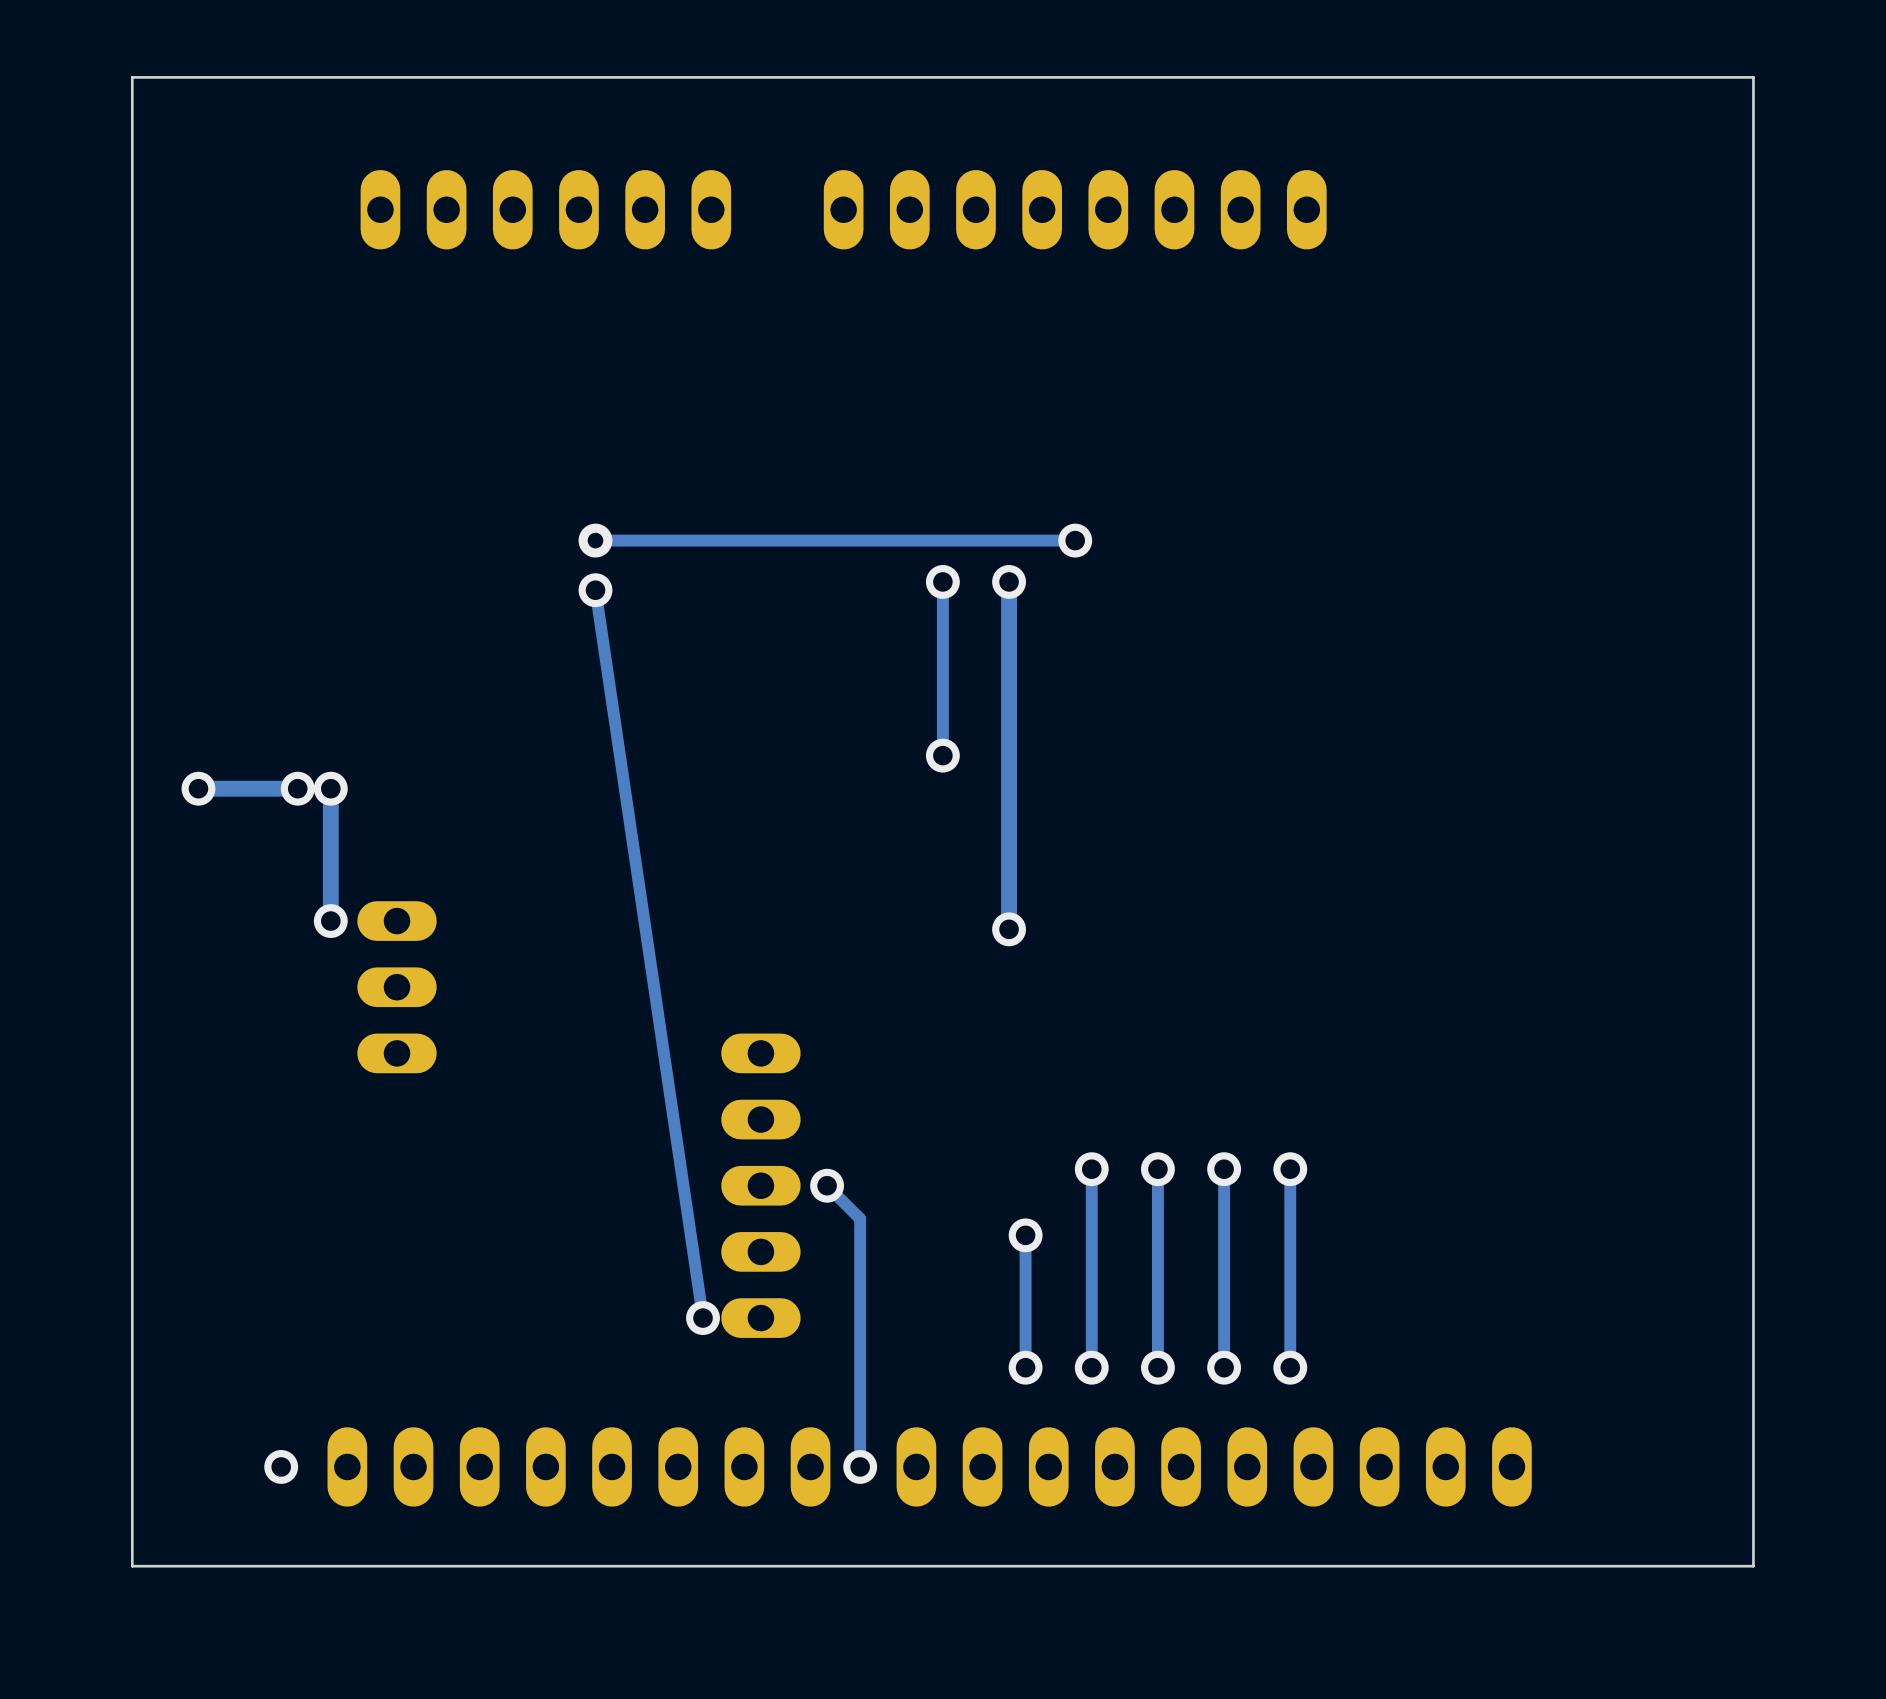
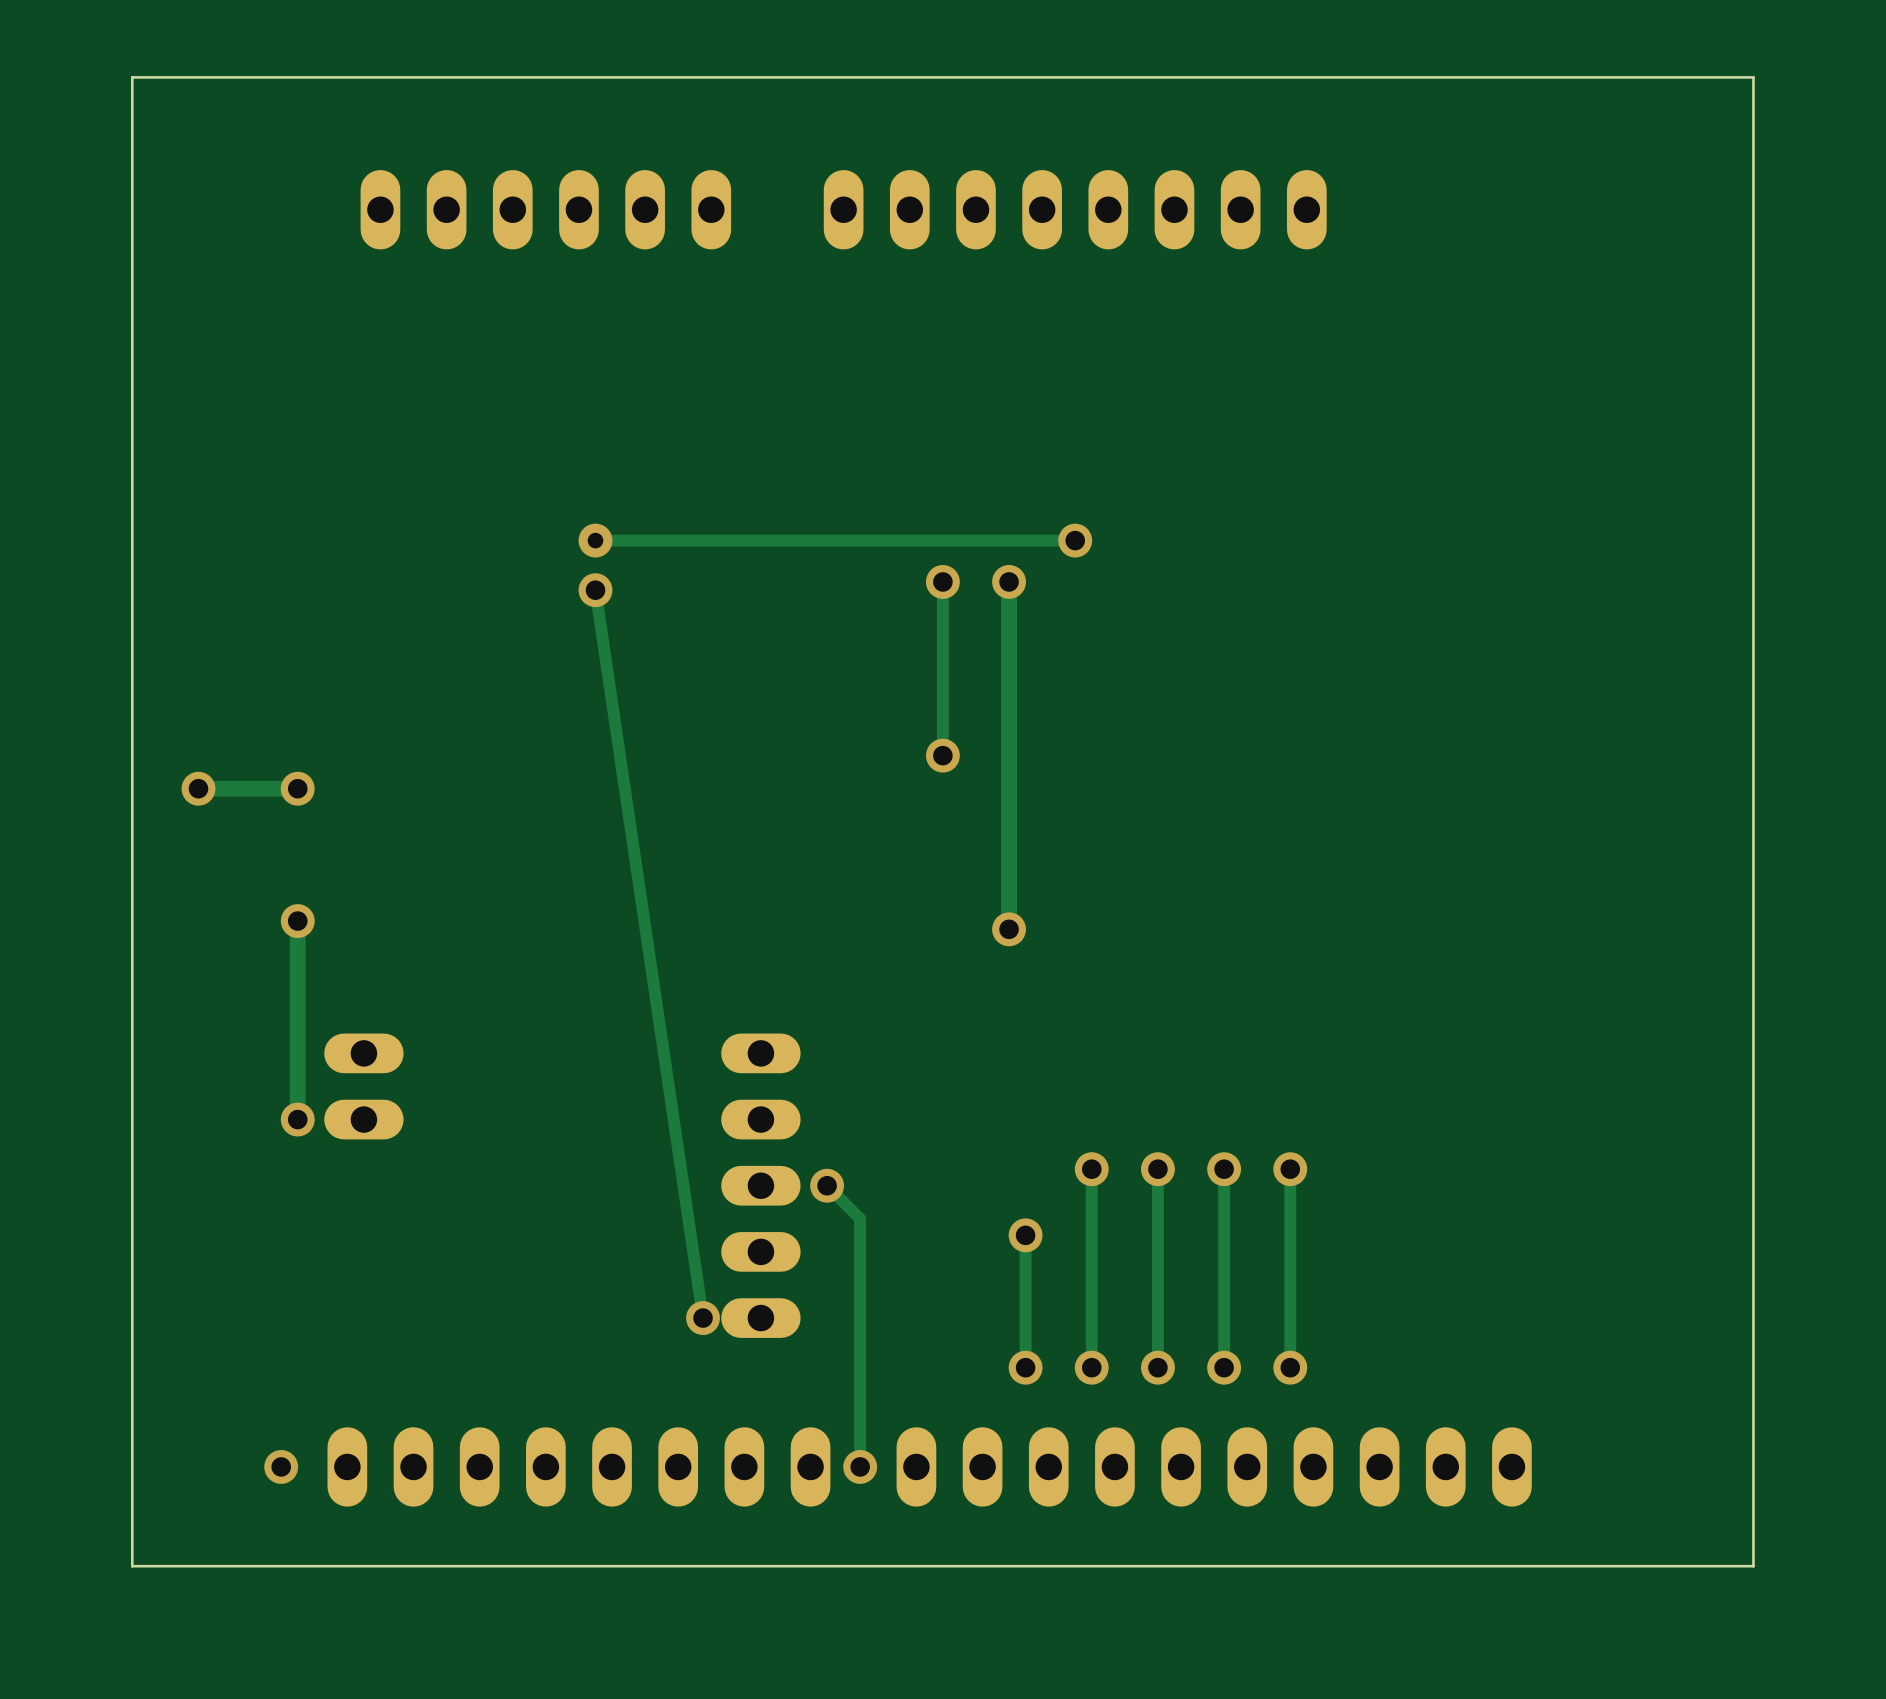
track: (330, 788) (330, 921) -> none
via: (330, 788) -> none
track: none -> (297, 921) (297, 1119)
via position: (330, 921) -> (297, 921)
part: (396, 987) -> none
part: none -> (363, 1086)
via: none -> (297, 1119)

